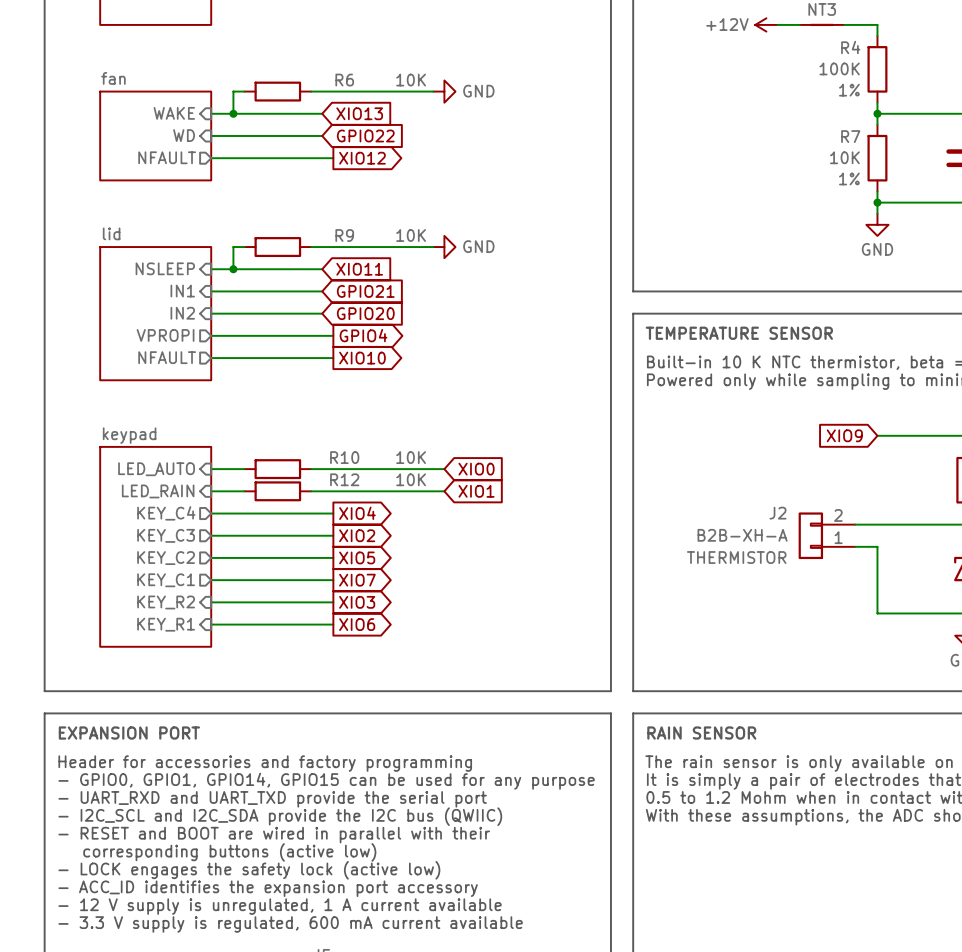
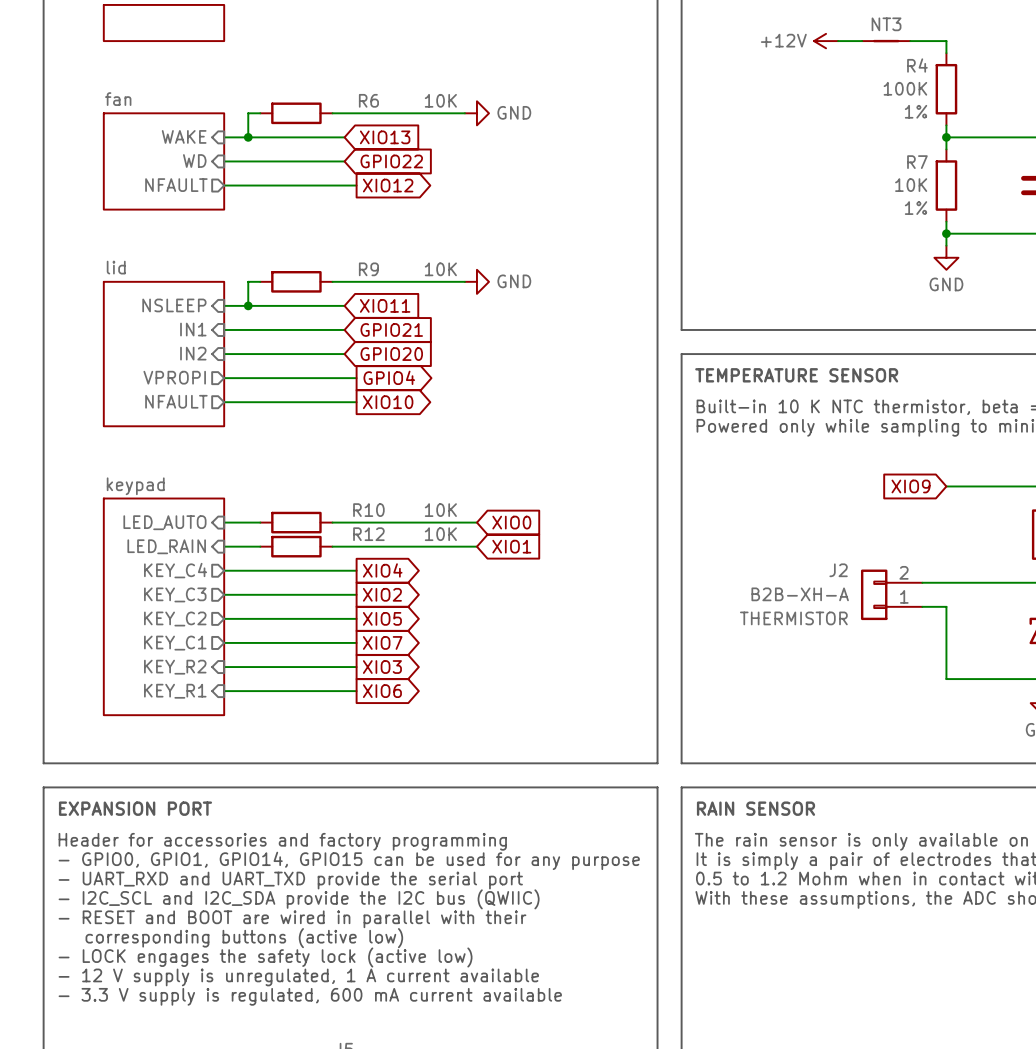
text: - ACC_ID identifies the expansion port accessory (268, 888) -> - 12 V supply is unregulated, 1 A current available (298, 977)
text: - 12 V supply is unregulated, 1 A current available (280, 906) -> - 3.3 V supply is regulated, 600 mA current available (310, 996)
text: - 3.3 V supply is regulated, 600 mA current available (290, 924) -> none

